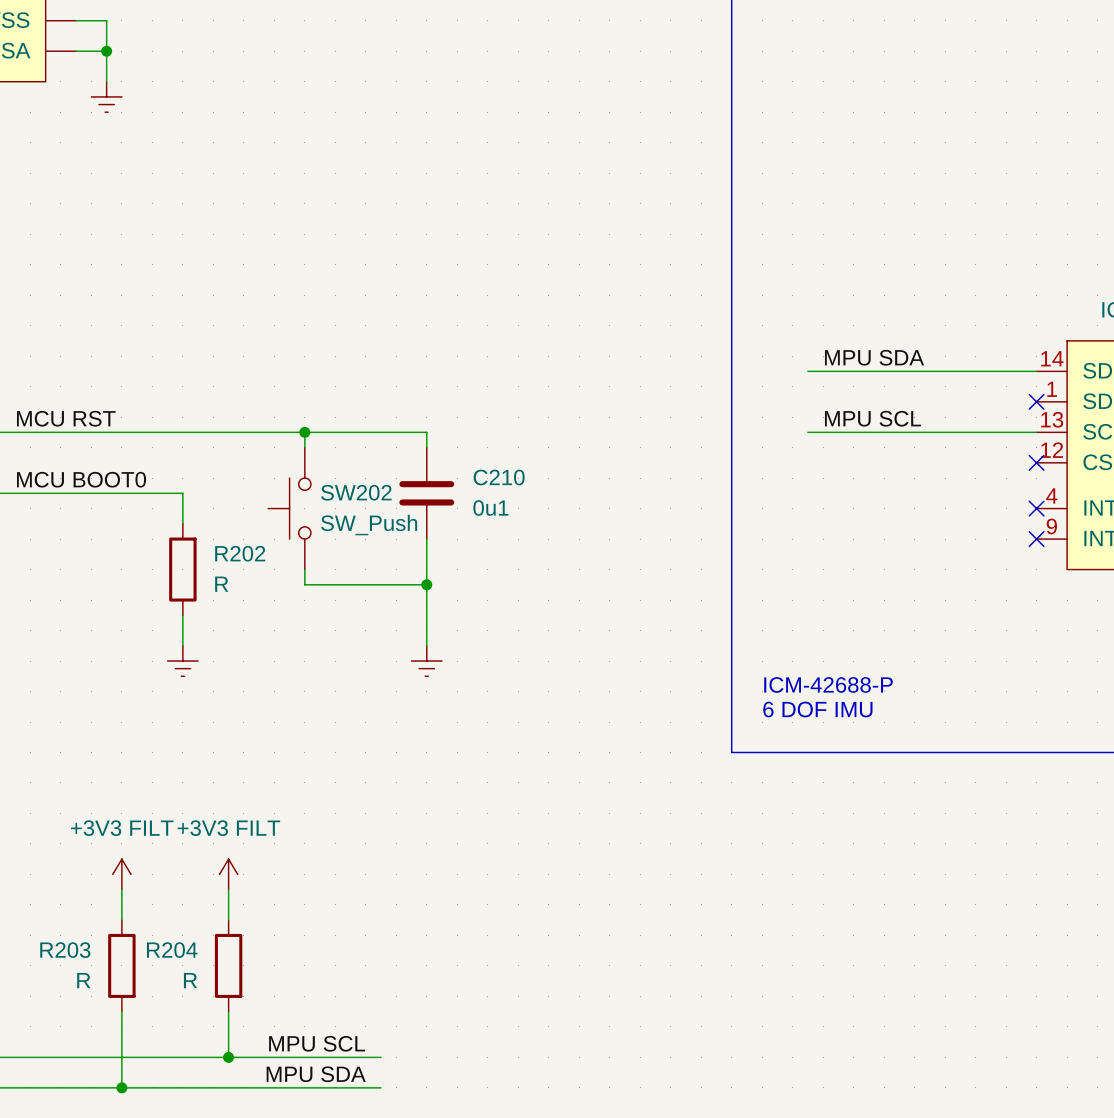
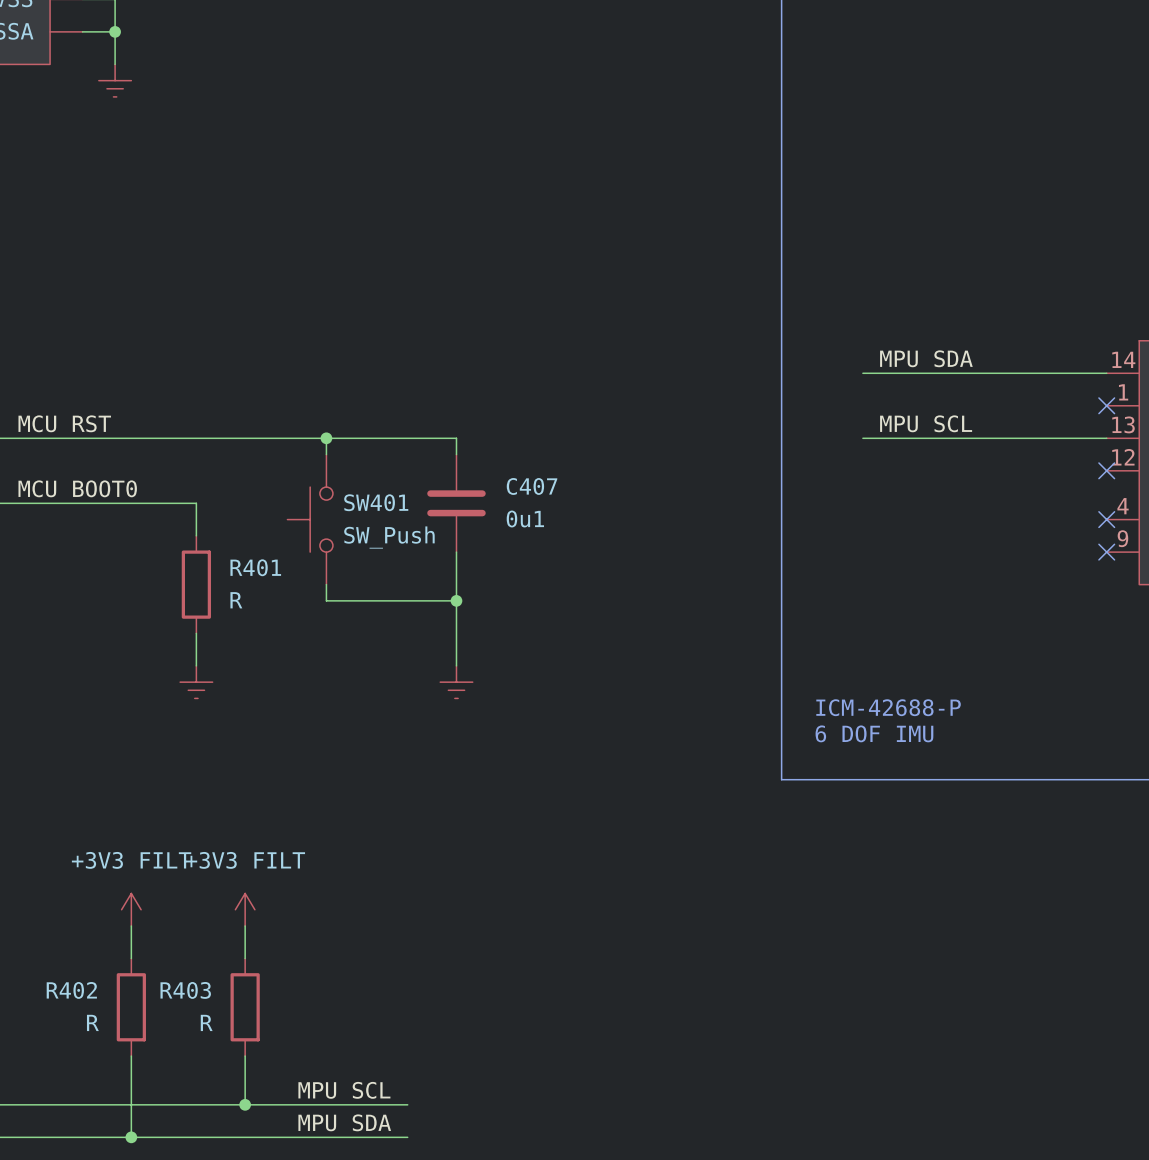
C210 name: C210 (499, 477) -> C407 (532, 486)
SW202 name: SW202 (356, 492) -> SW401 (376, 502)
R202 name: R202 (240, 553) -> R401 (255, 567)
R203 name: R203 (65, 950) -> R402 (71, 990)
R204 name: R204 (172, 950) -> R403 (185, 990)

